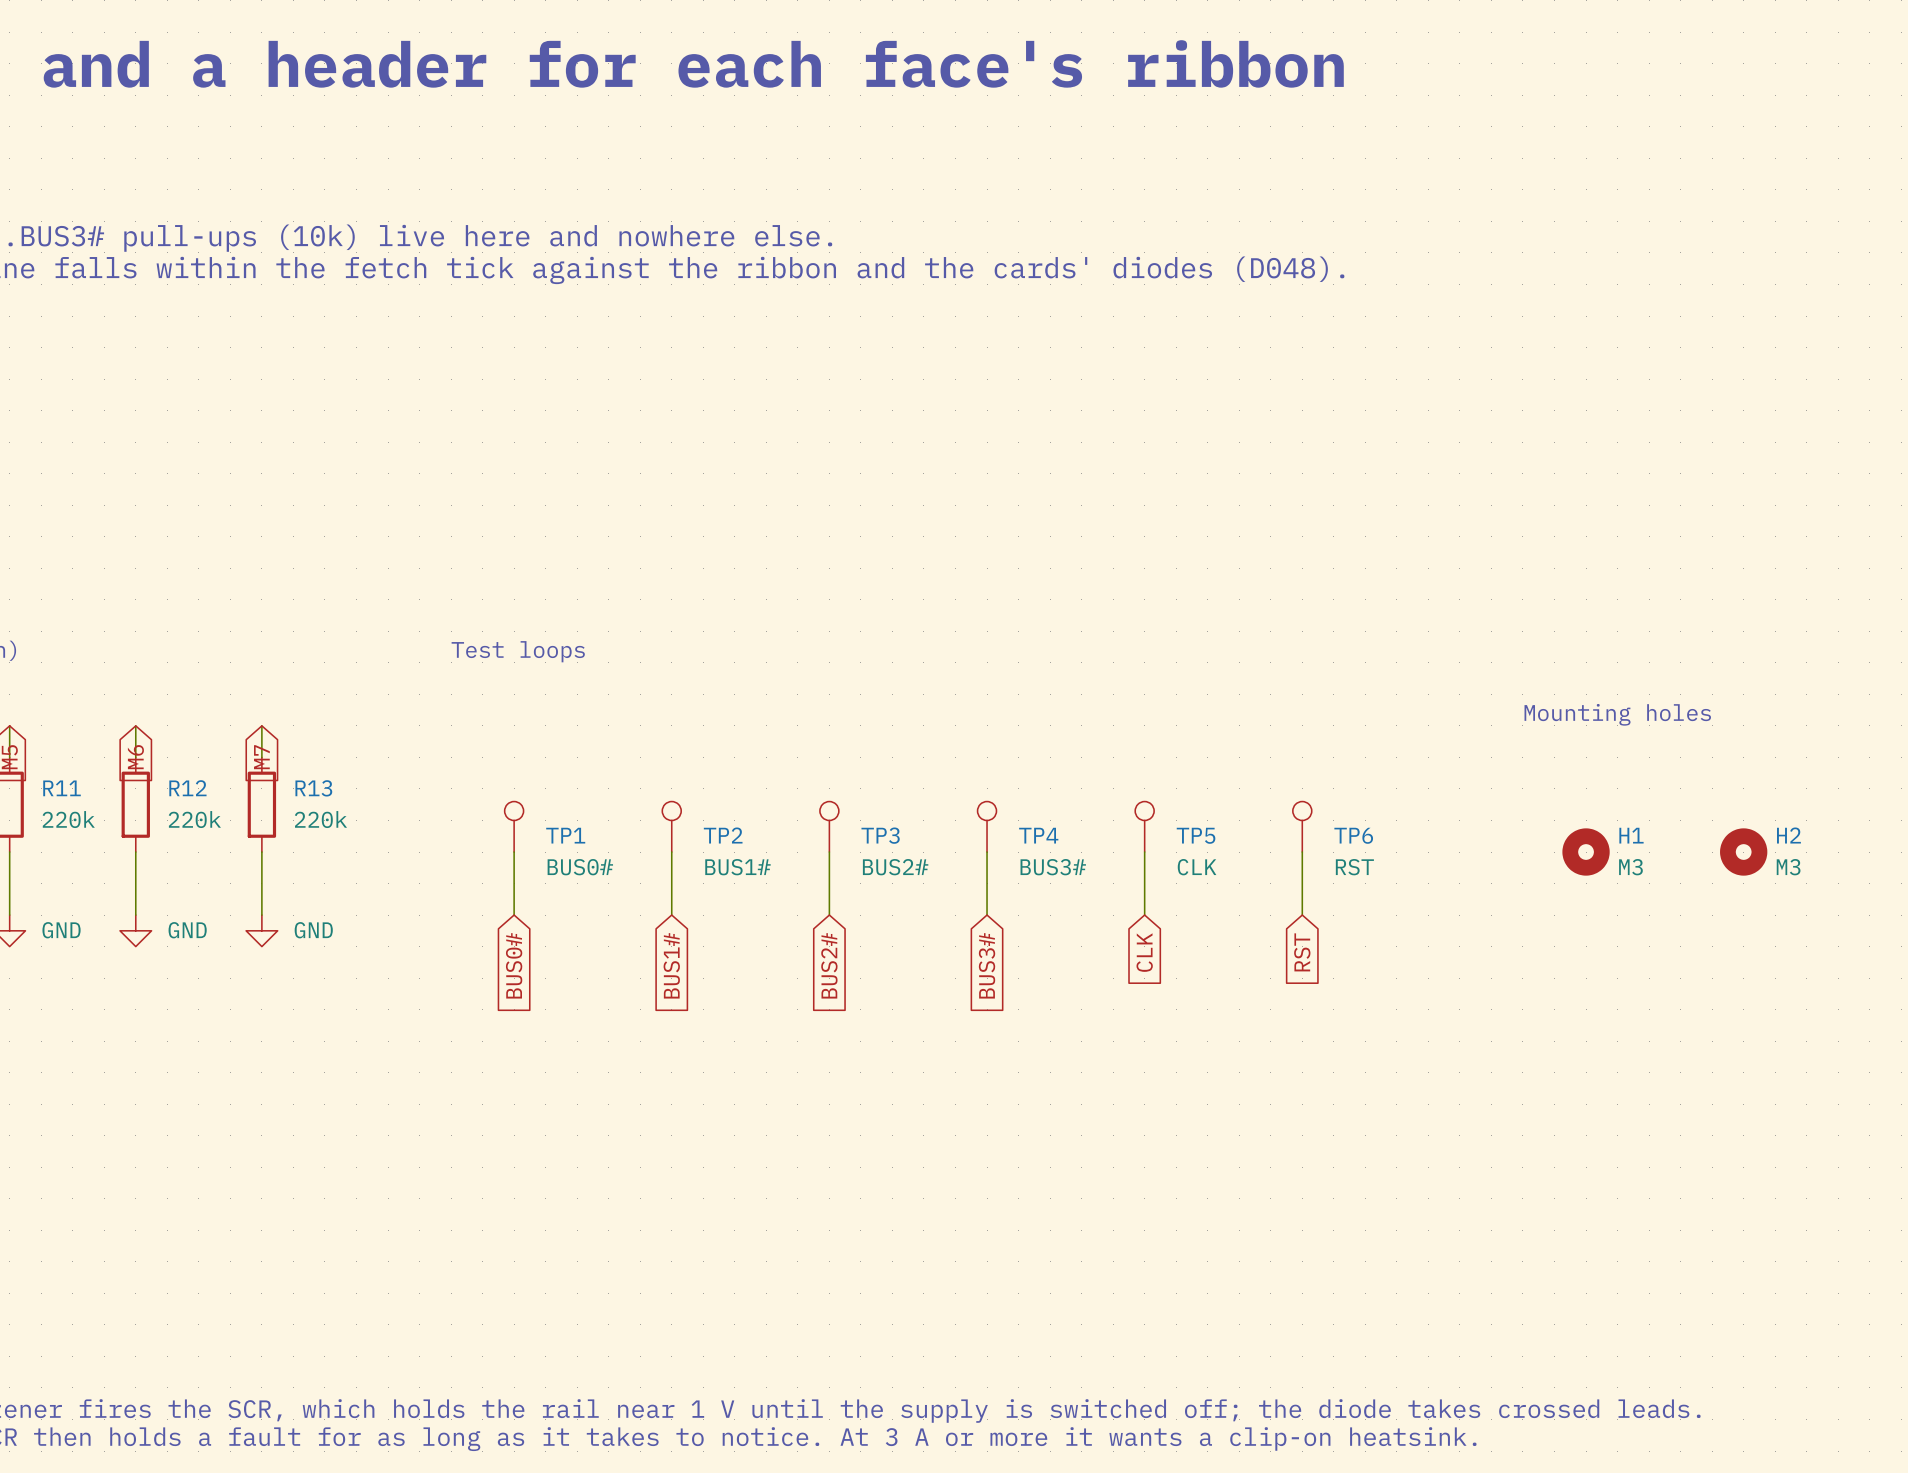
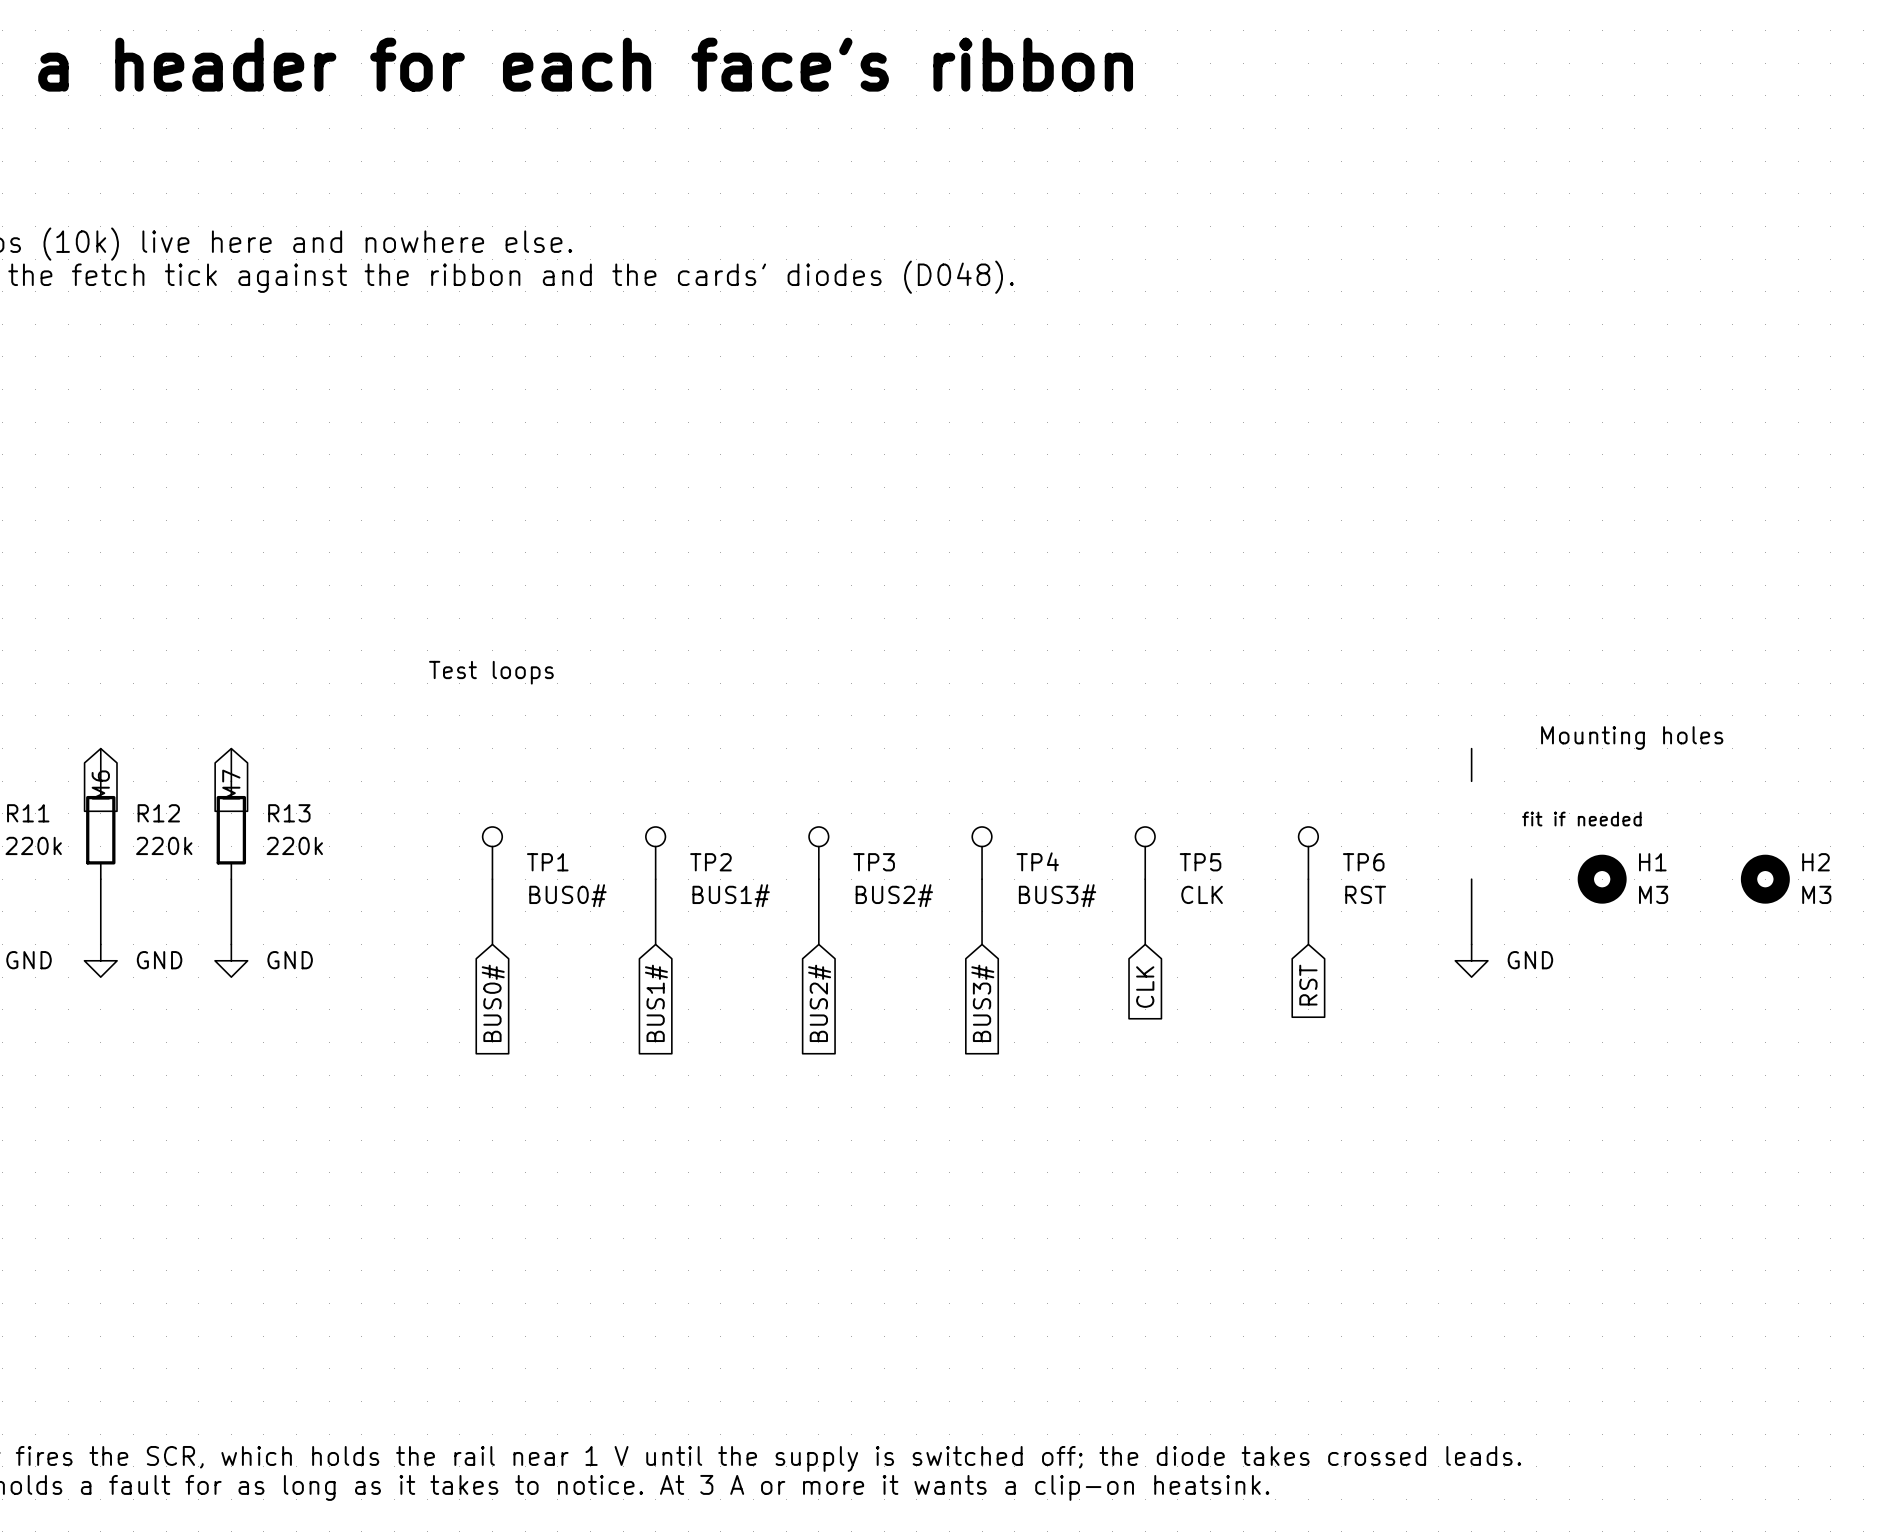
wire: none -> (1471, 748) (1471, 781)
text: none -> fit if needed (1581, 819)
wire: none -> (1471, 879) (1471, 944)
power symbol: none -> GND (1471, 960)

